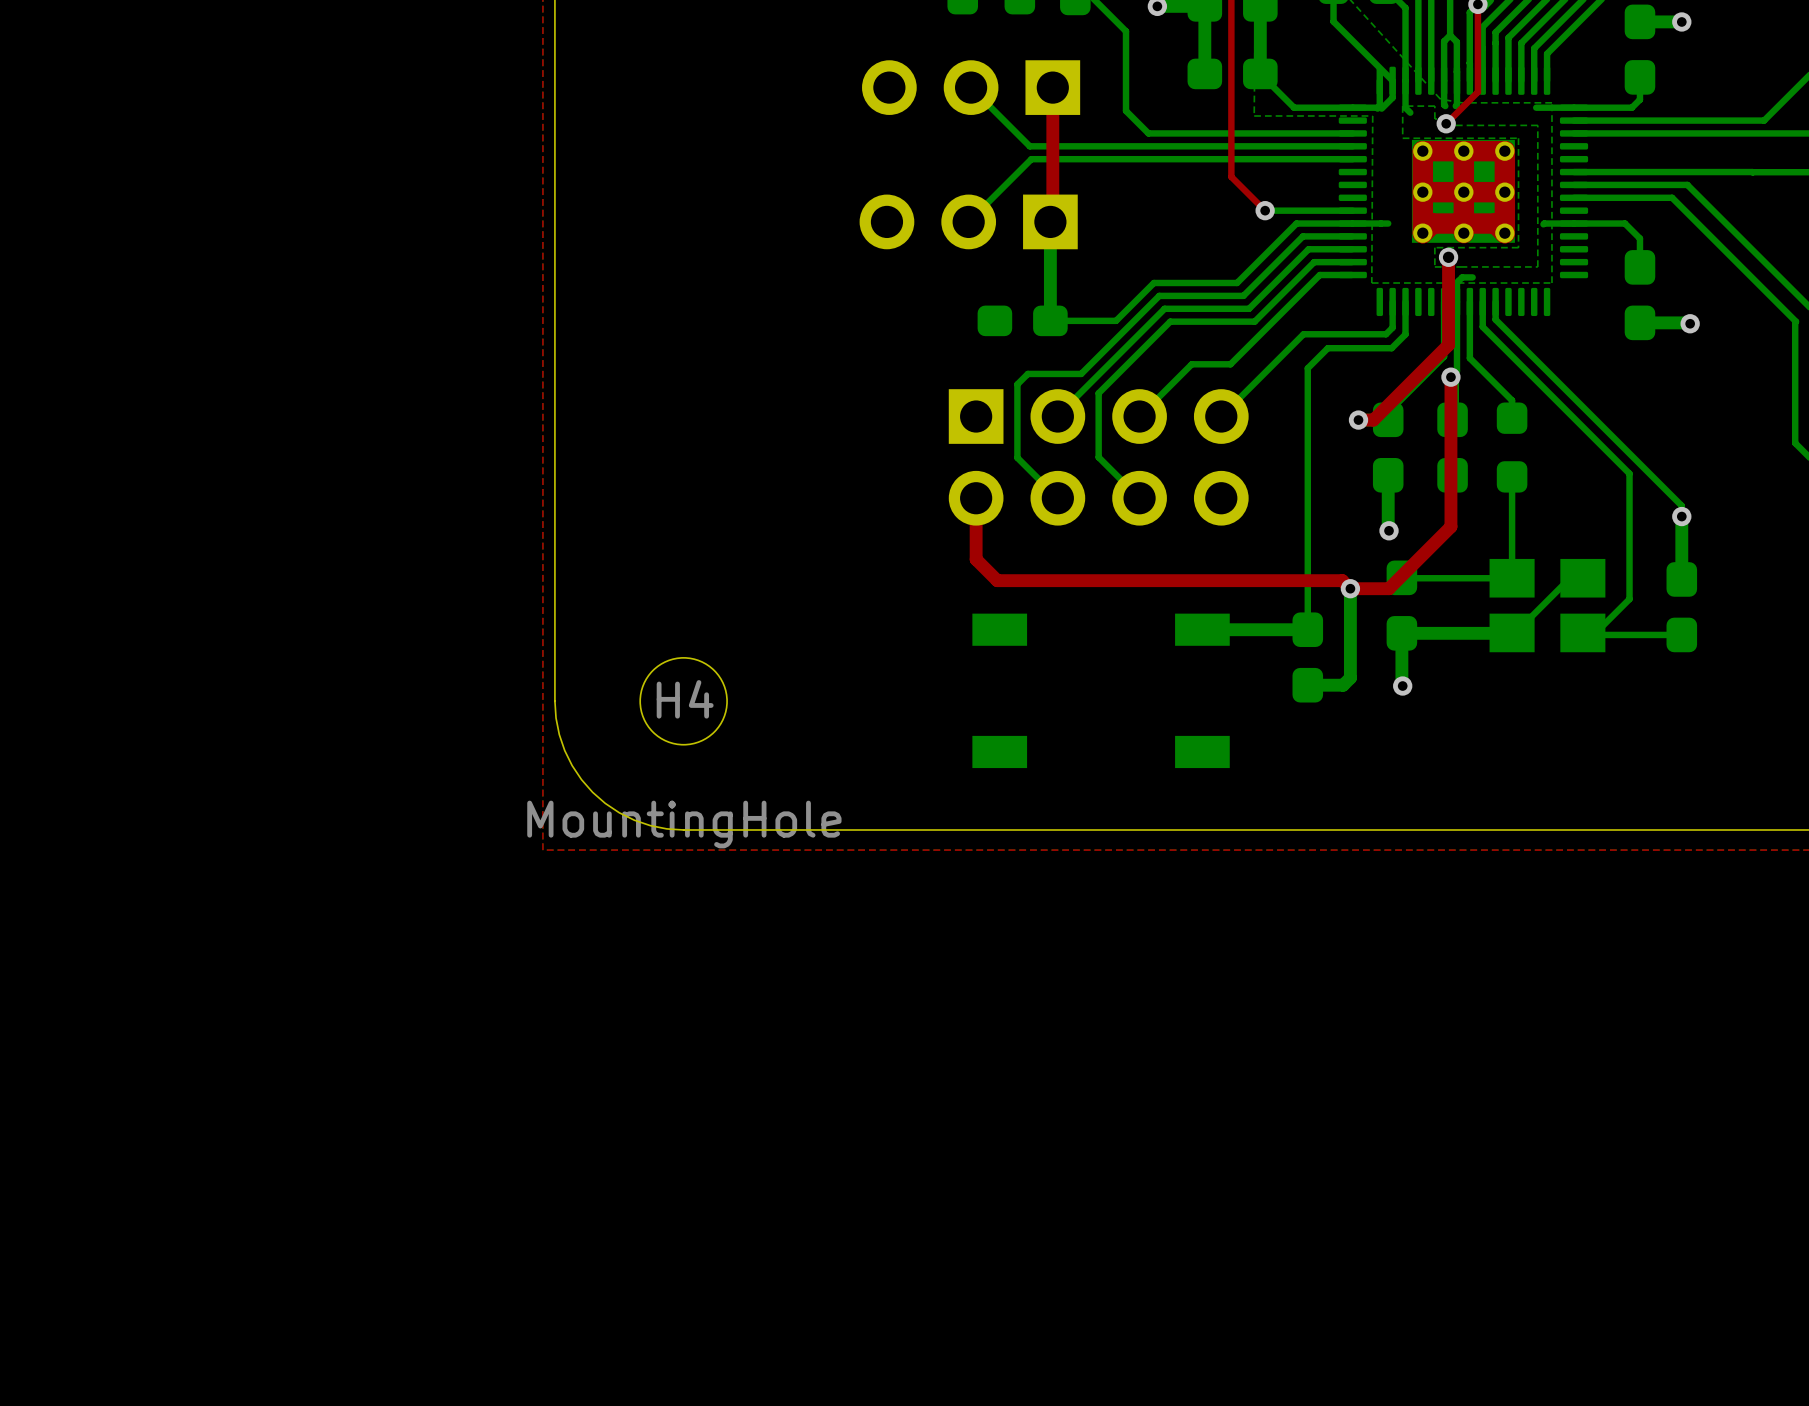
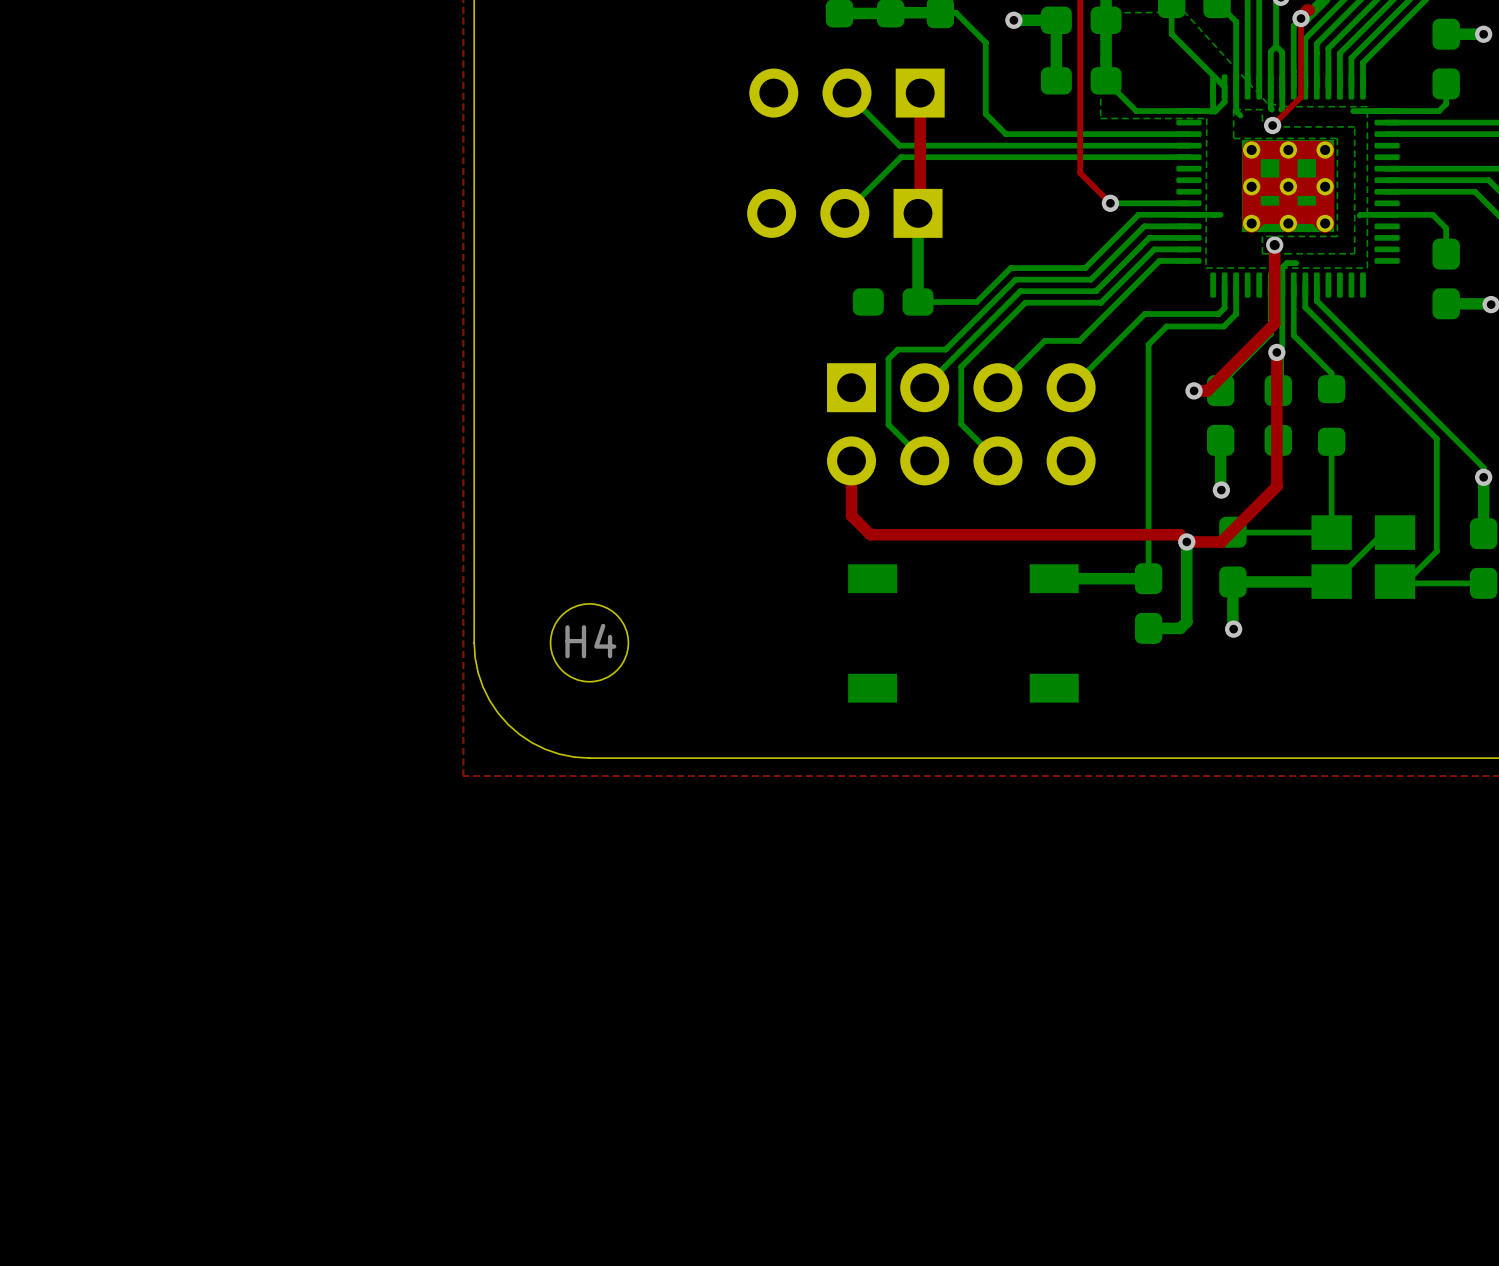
H4 value: MountingHole (684, 824) -> none

